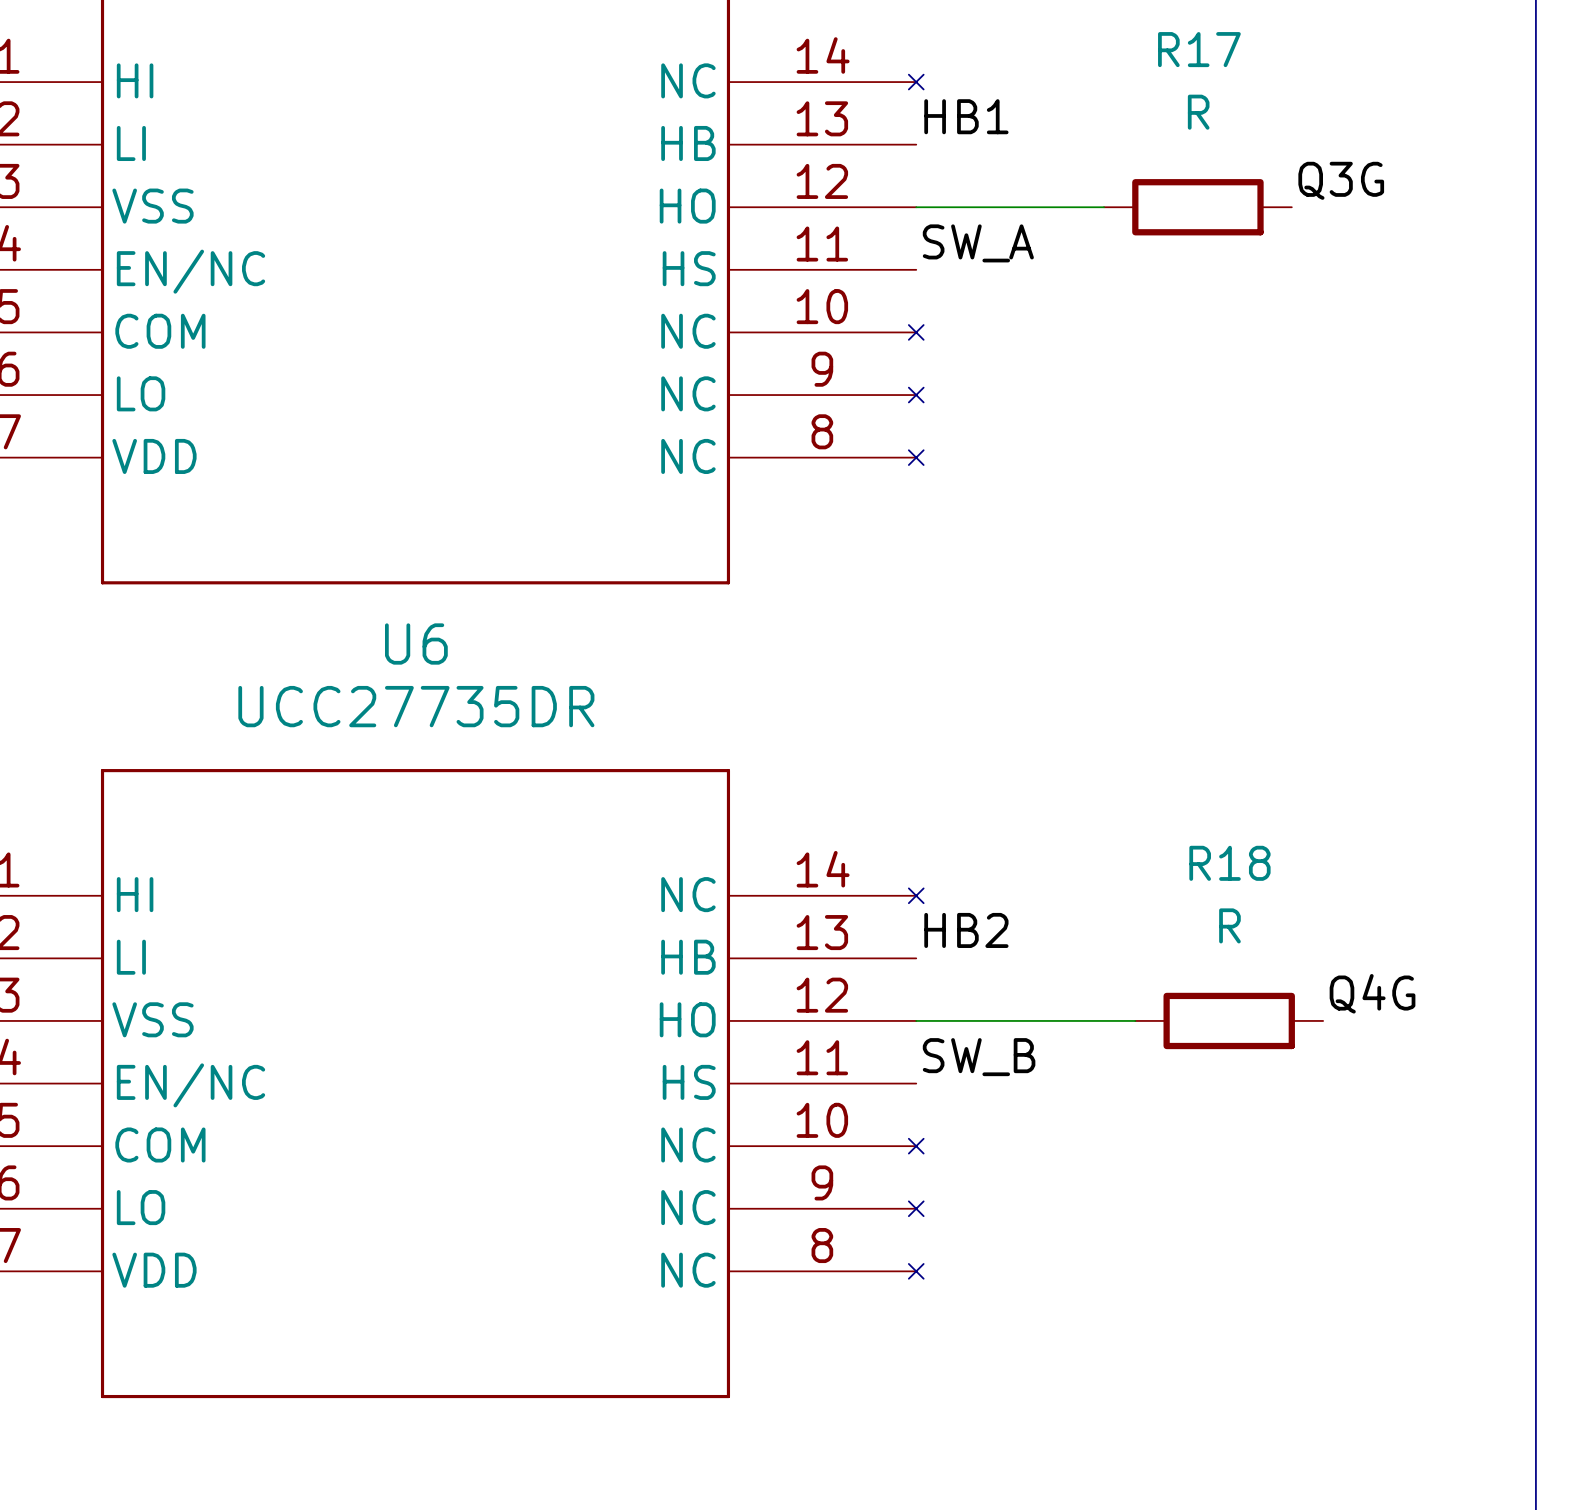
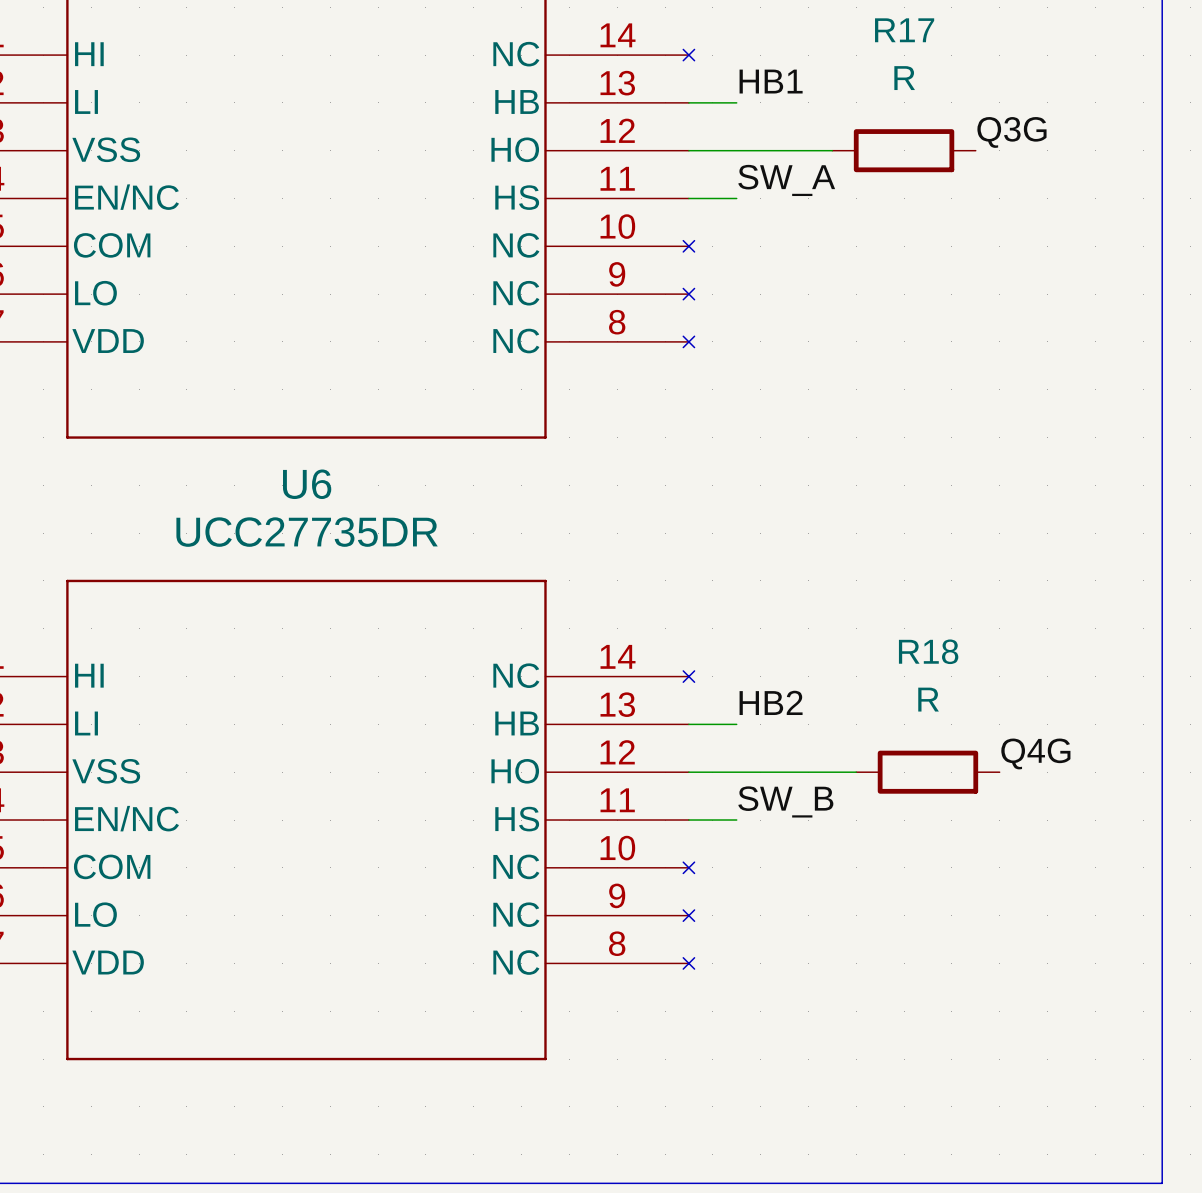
label position: HB1 (966, 116) -> HB1 (771, 81)
wire: none -> (688, 102) (736, 102)
label position: SW_A (978, 243) -> SW_A (786, 180)
wire: none -> (688, 198) (736, 198)
label position: HB2 (966, 930) -> HB2 (771, 702)
wire: none -> (688, 724) (736, 724)
label position: SW_B (979, 1057) -> SW_B (785, 801)
wire: none -> (688, 820) (736, 820)

